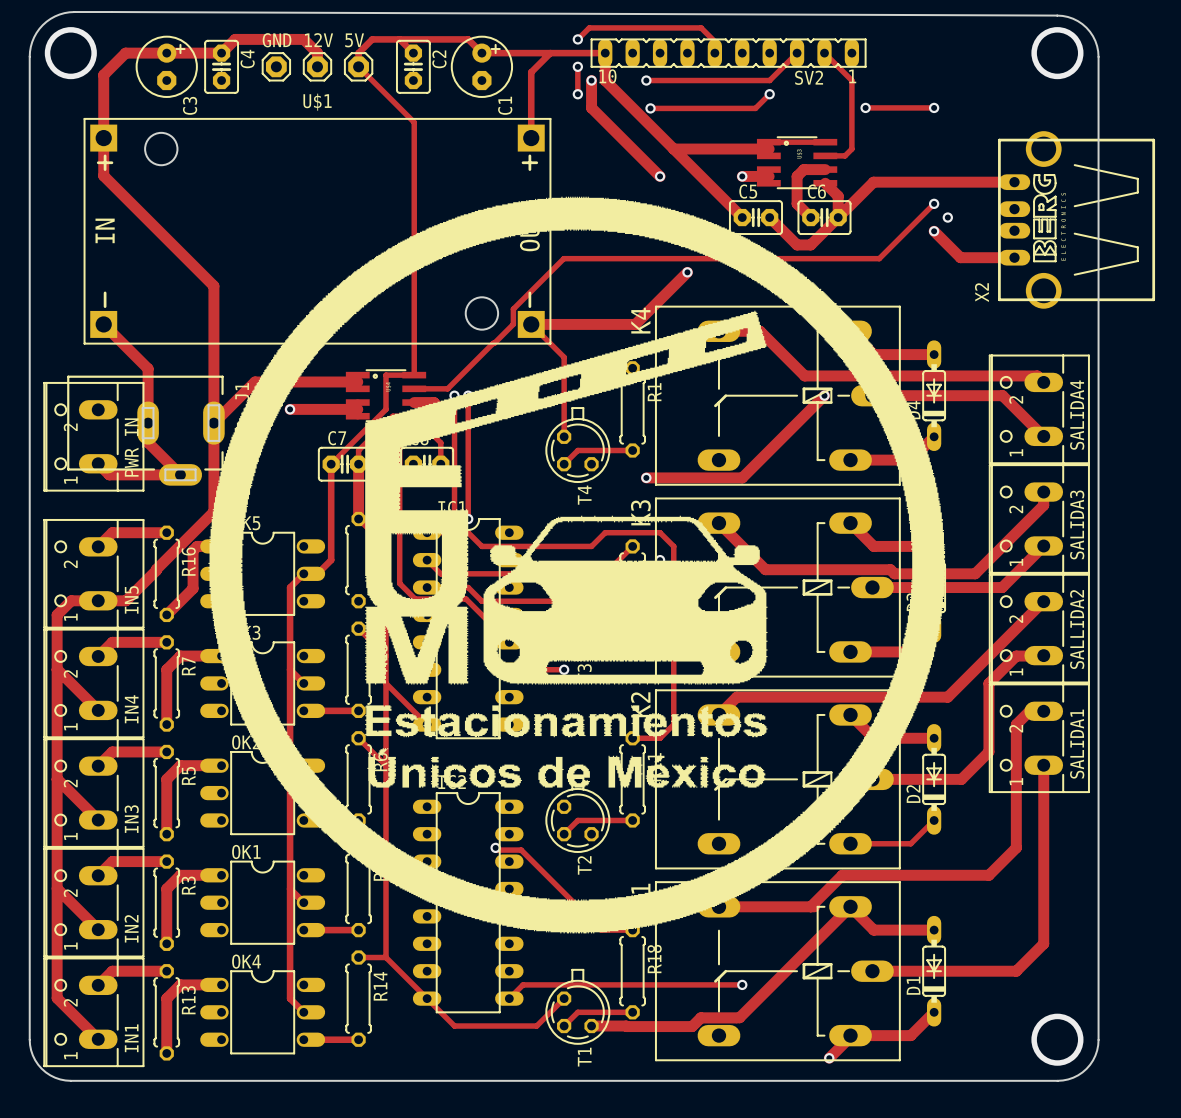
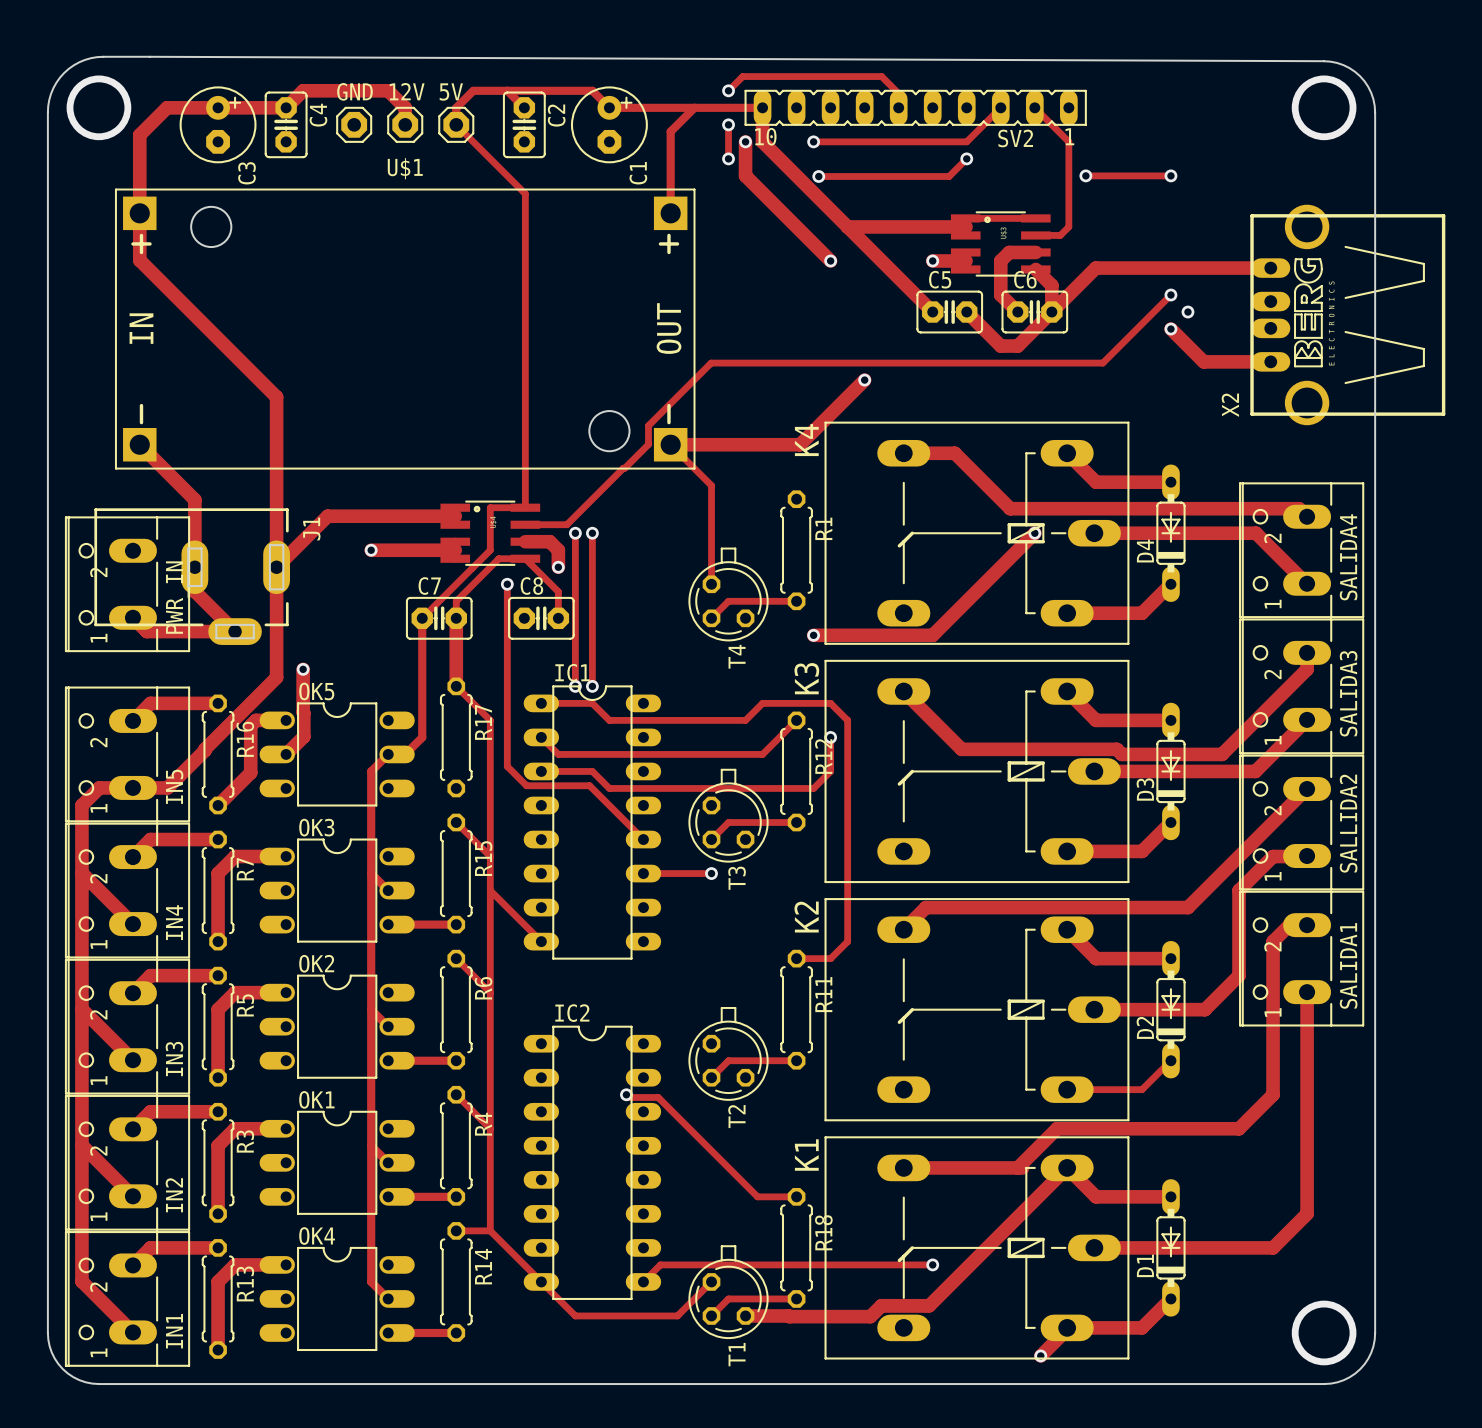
drawing: [208, 196, 946, 934] -> none
drawing: [365, 310, 767, 685] -> none
drawing: [483, 515, 768, 685] -> none
drawing: [365, 705, 768, 788] -> none
drawing: [608, 755, 766, 788] -> none
drawing: [538, 756, 590, 788] -> none

